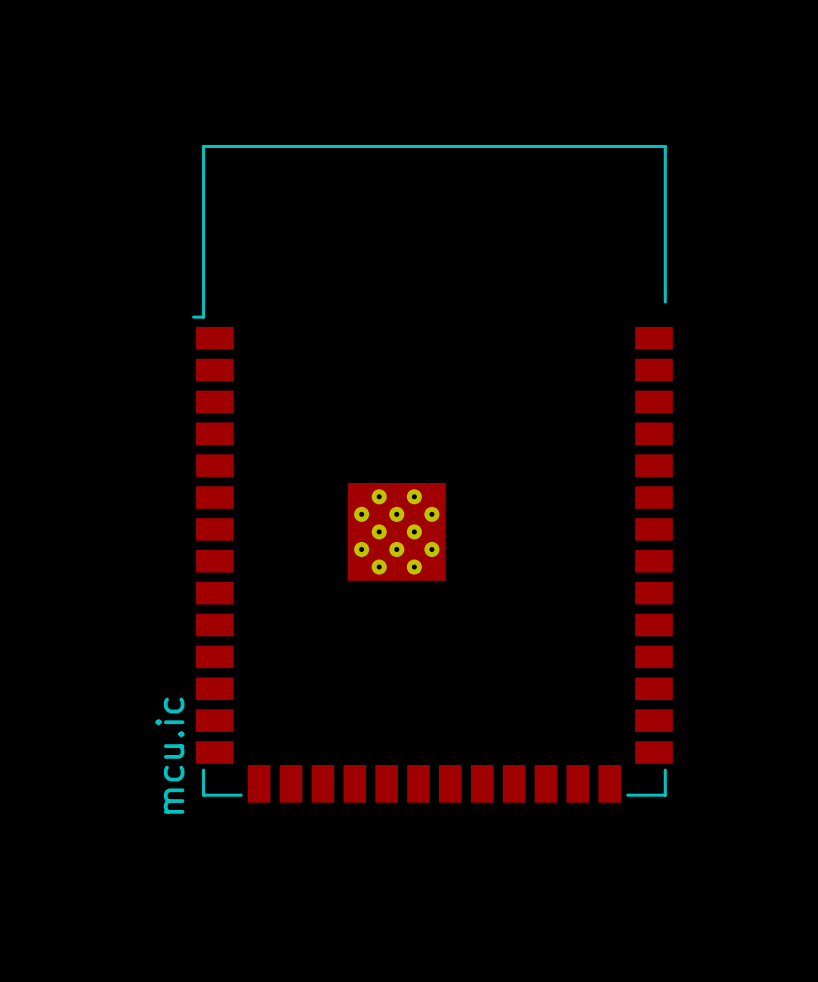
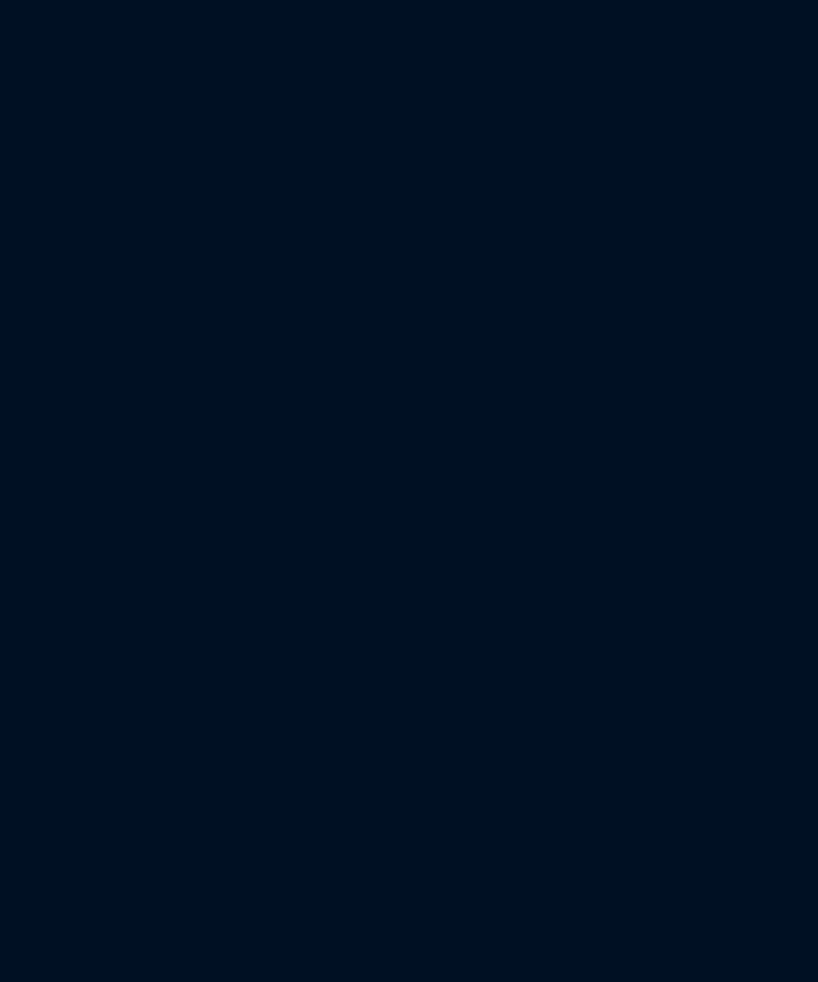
mcu.ic: (432, 473) -> none

